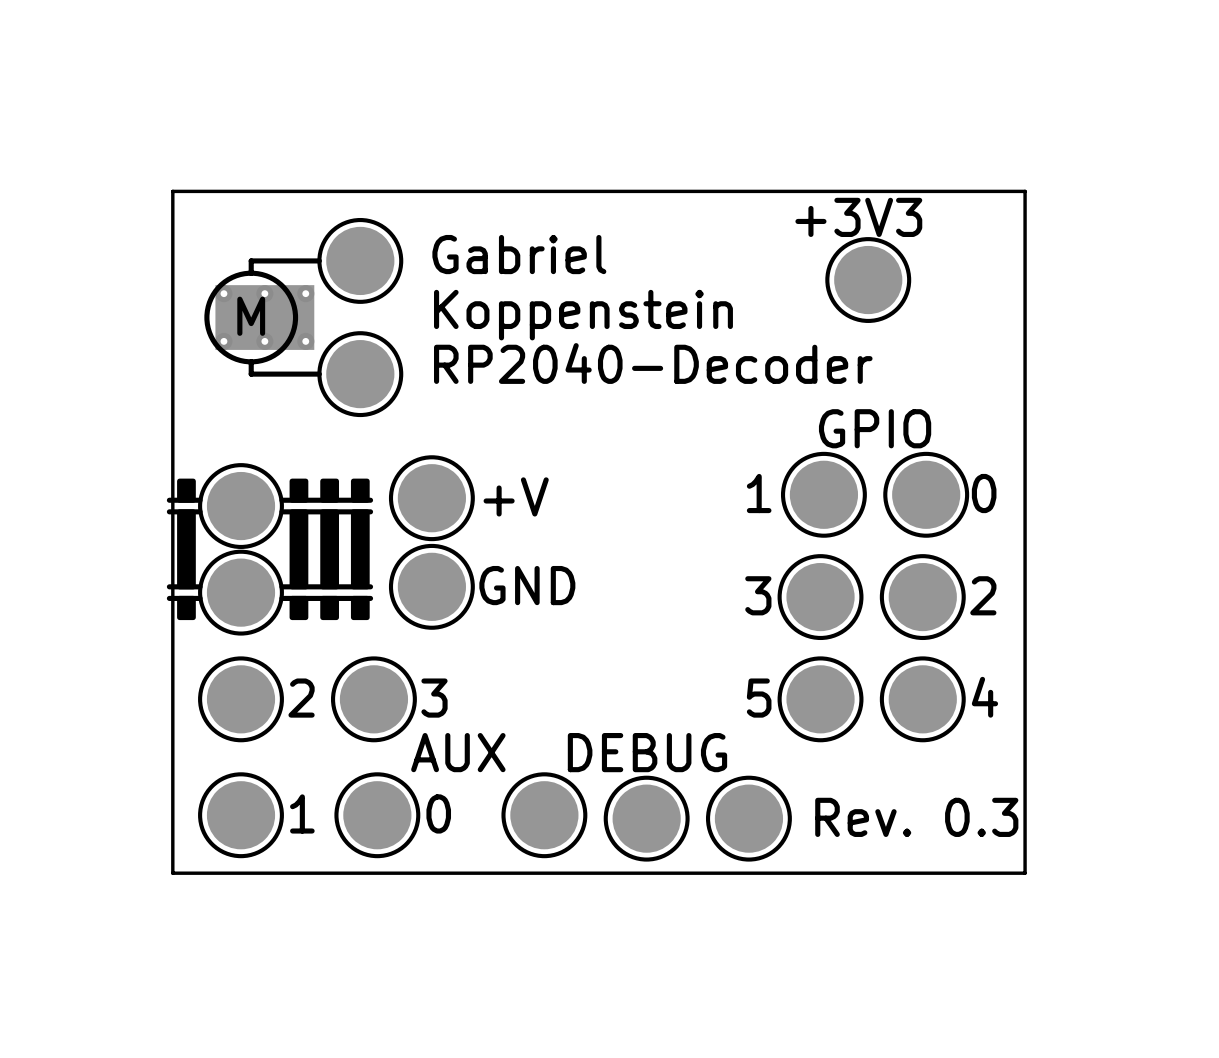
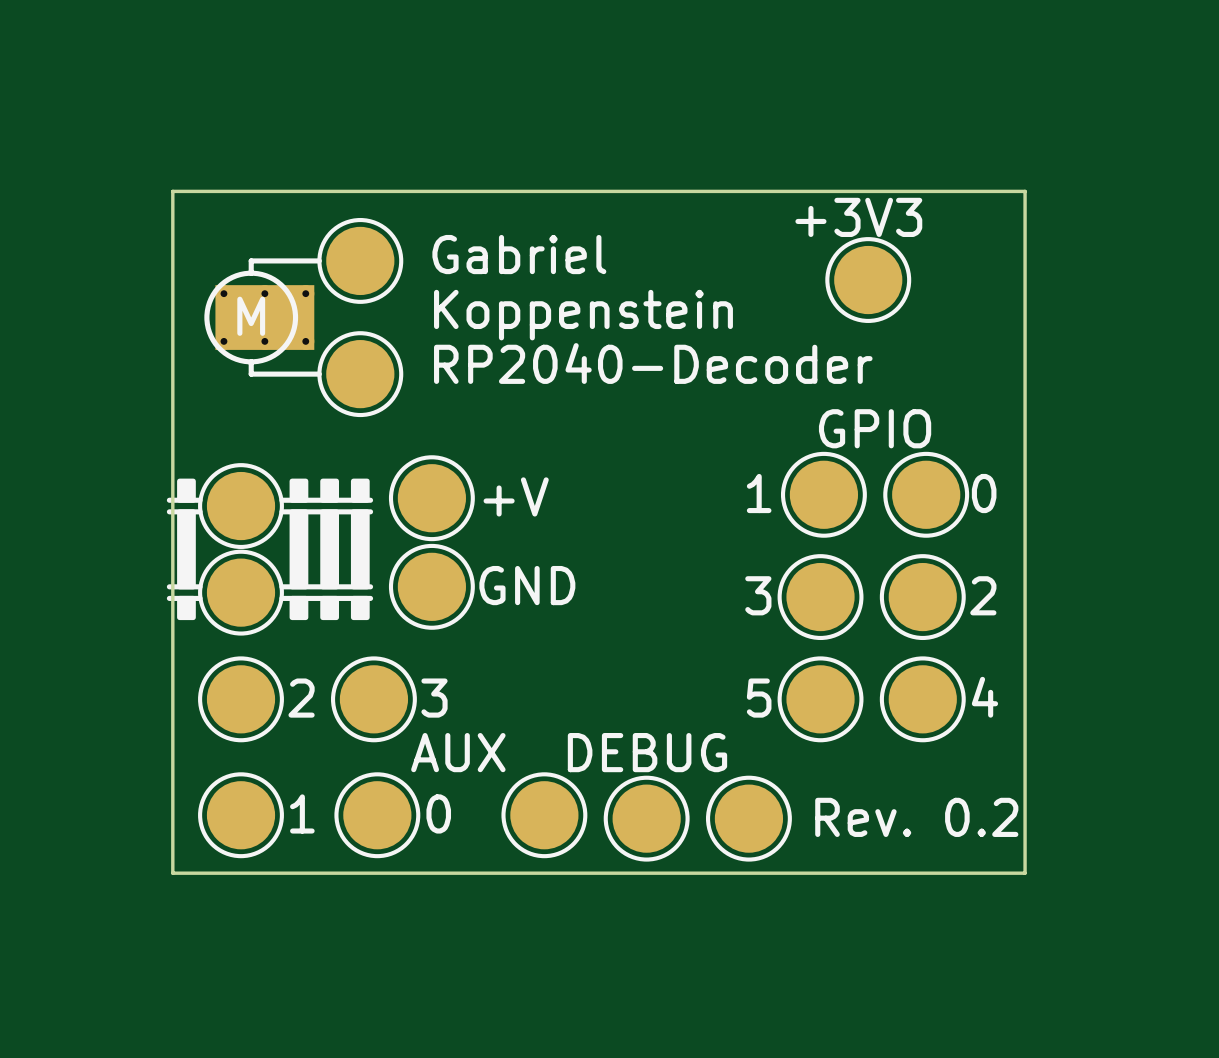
text: Rev. 0.3 (916, 817) -> Rev. 0.2 (916, 817)

